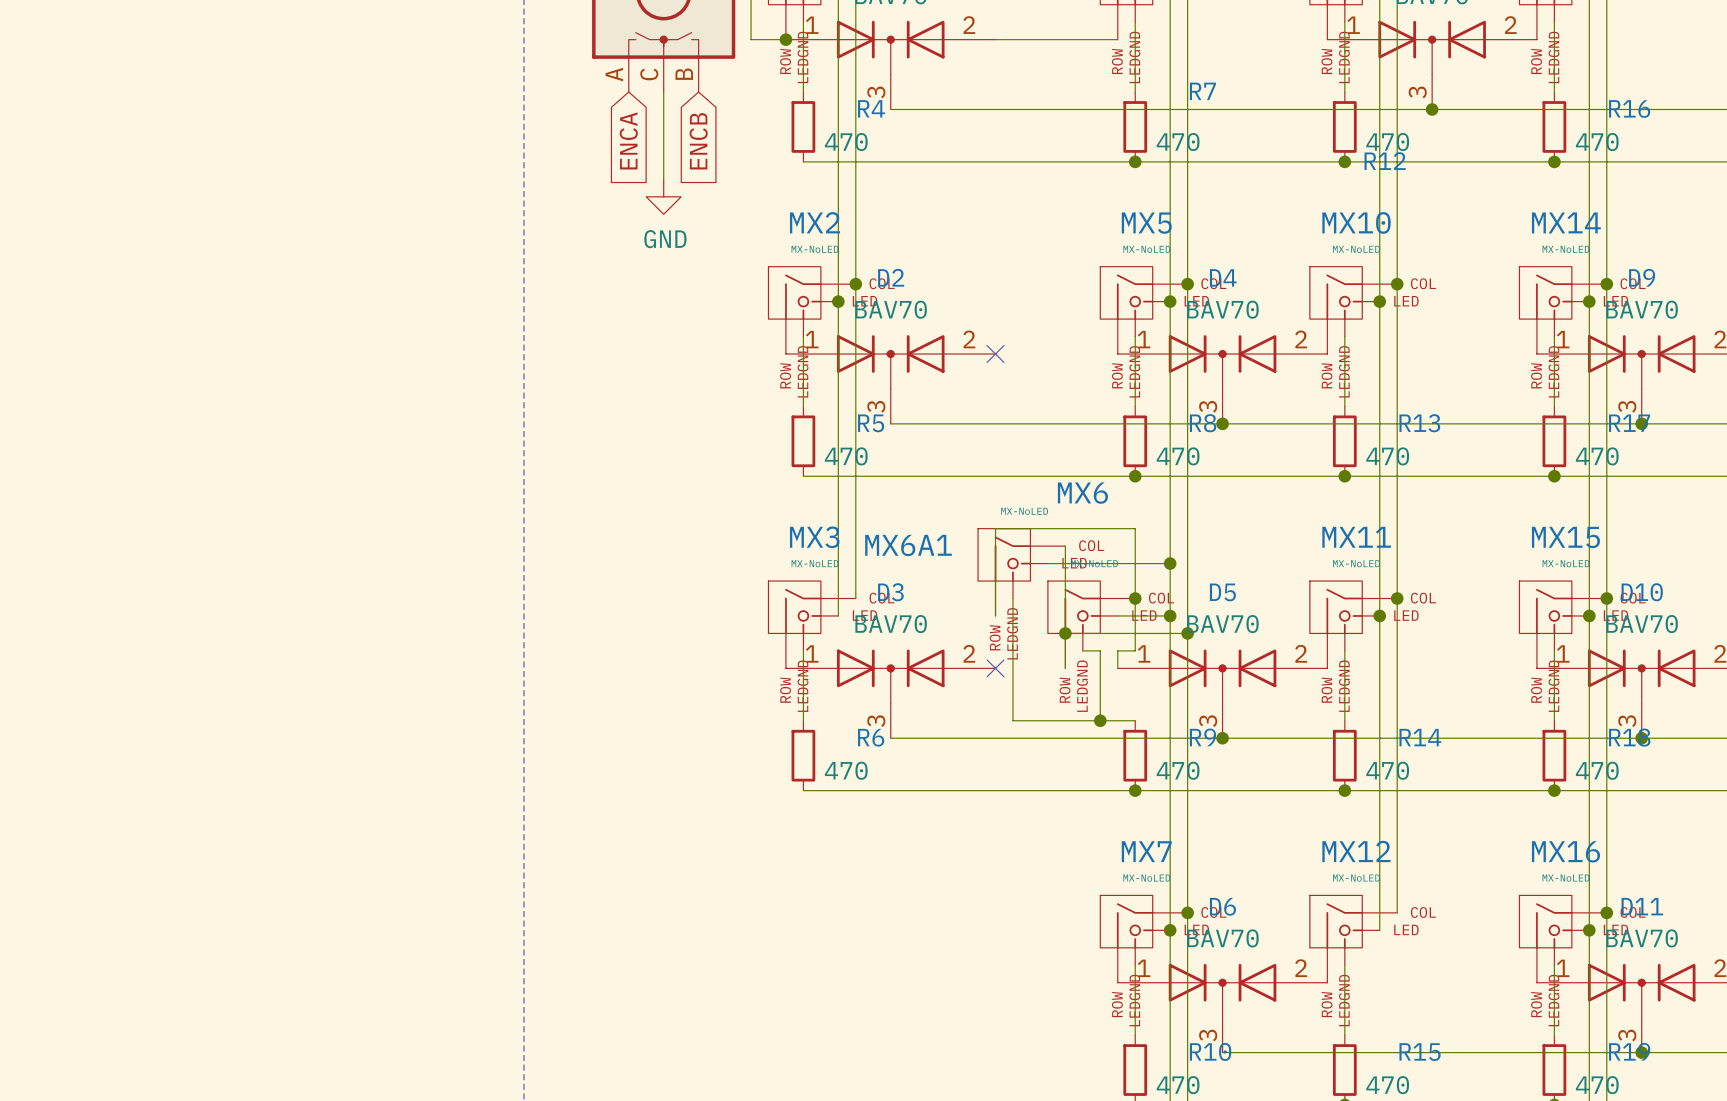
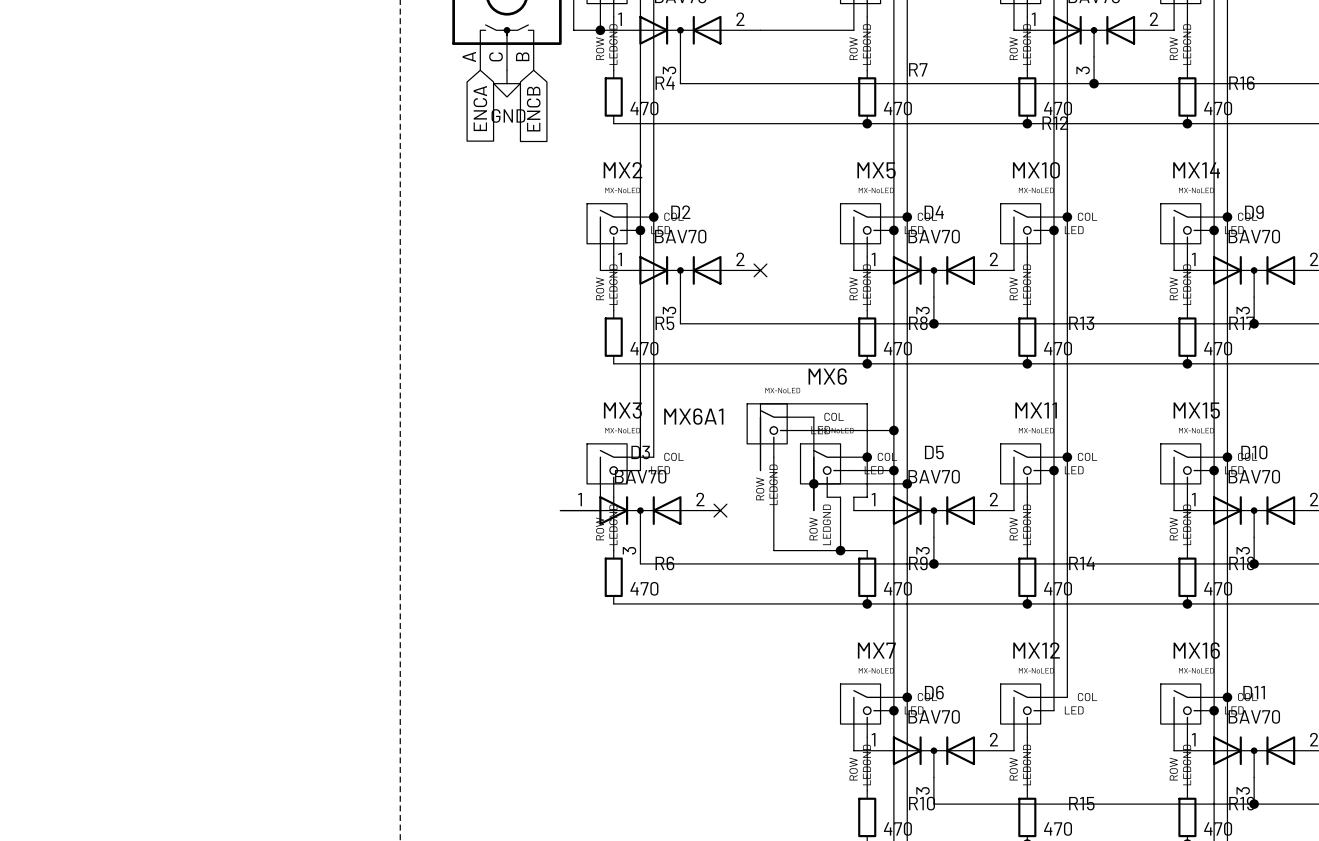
wire: (663, 92) (663, 179) -> none
power symbol position: GND (663, 196) -> GND (507, 83)
no-connect mark position: (995, 668) -> (720, 510)
D3 position: (890, 693) -> (640, 530)
wire: none -> (640, 563) (680, 563)

